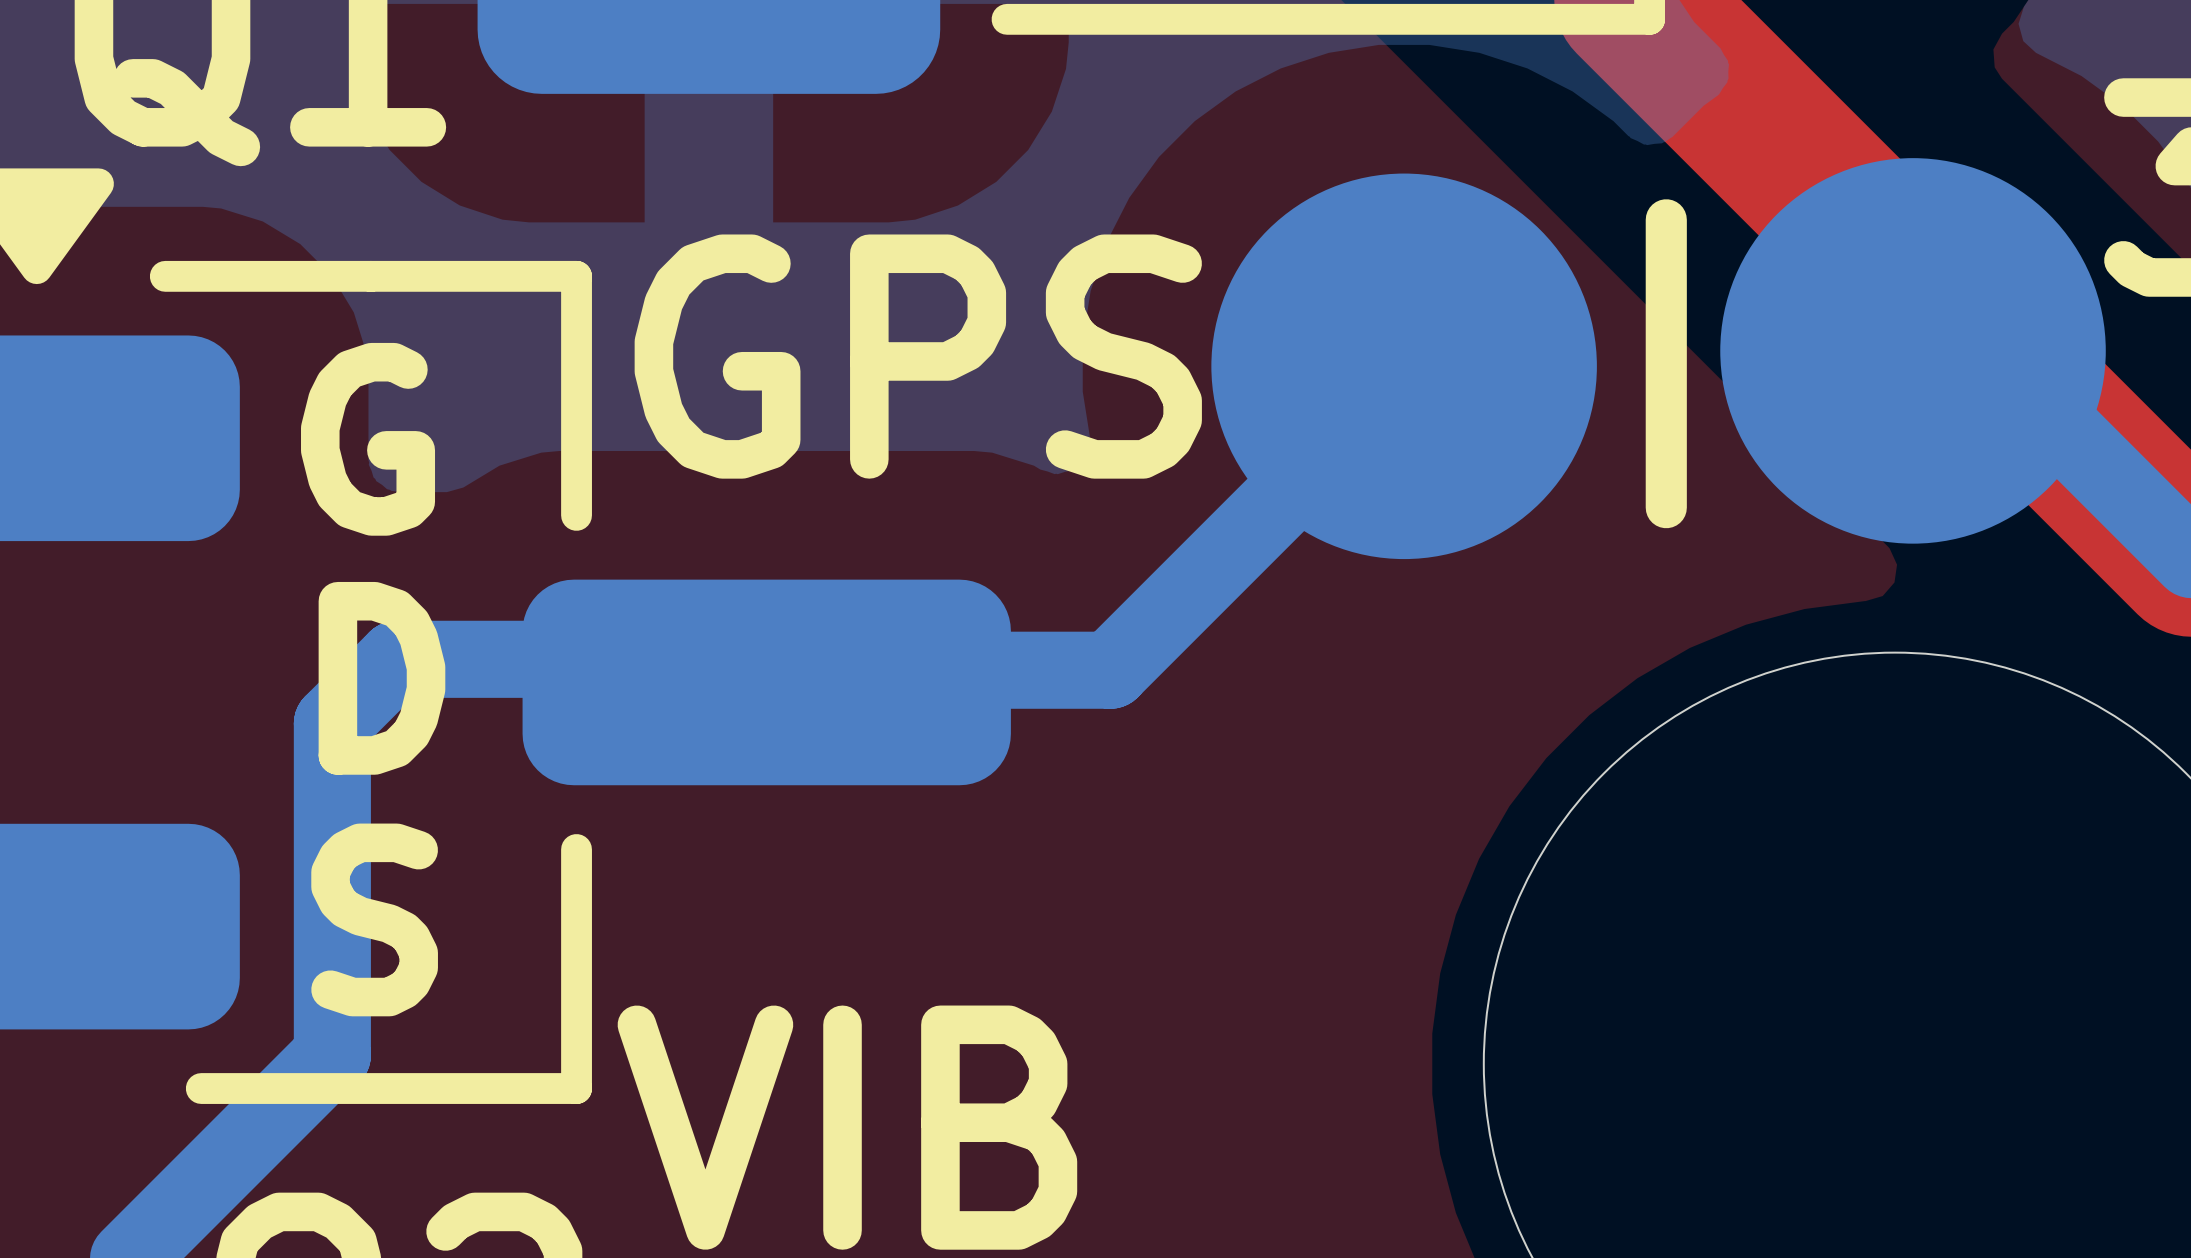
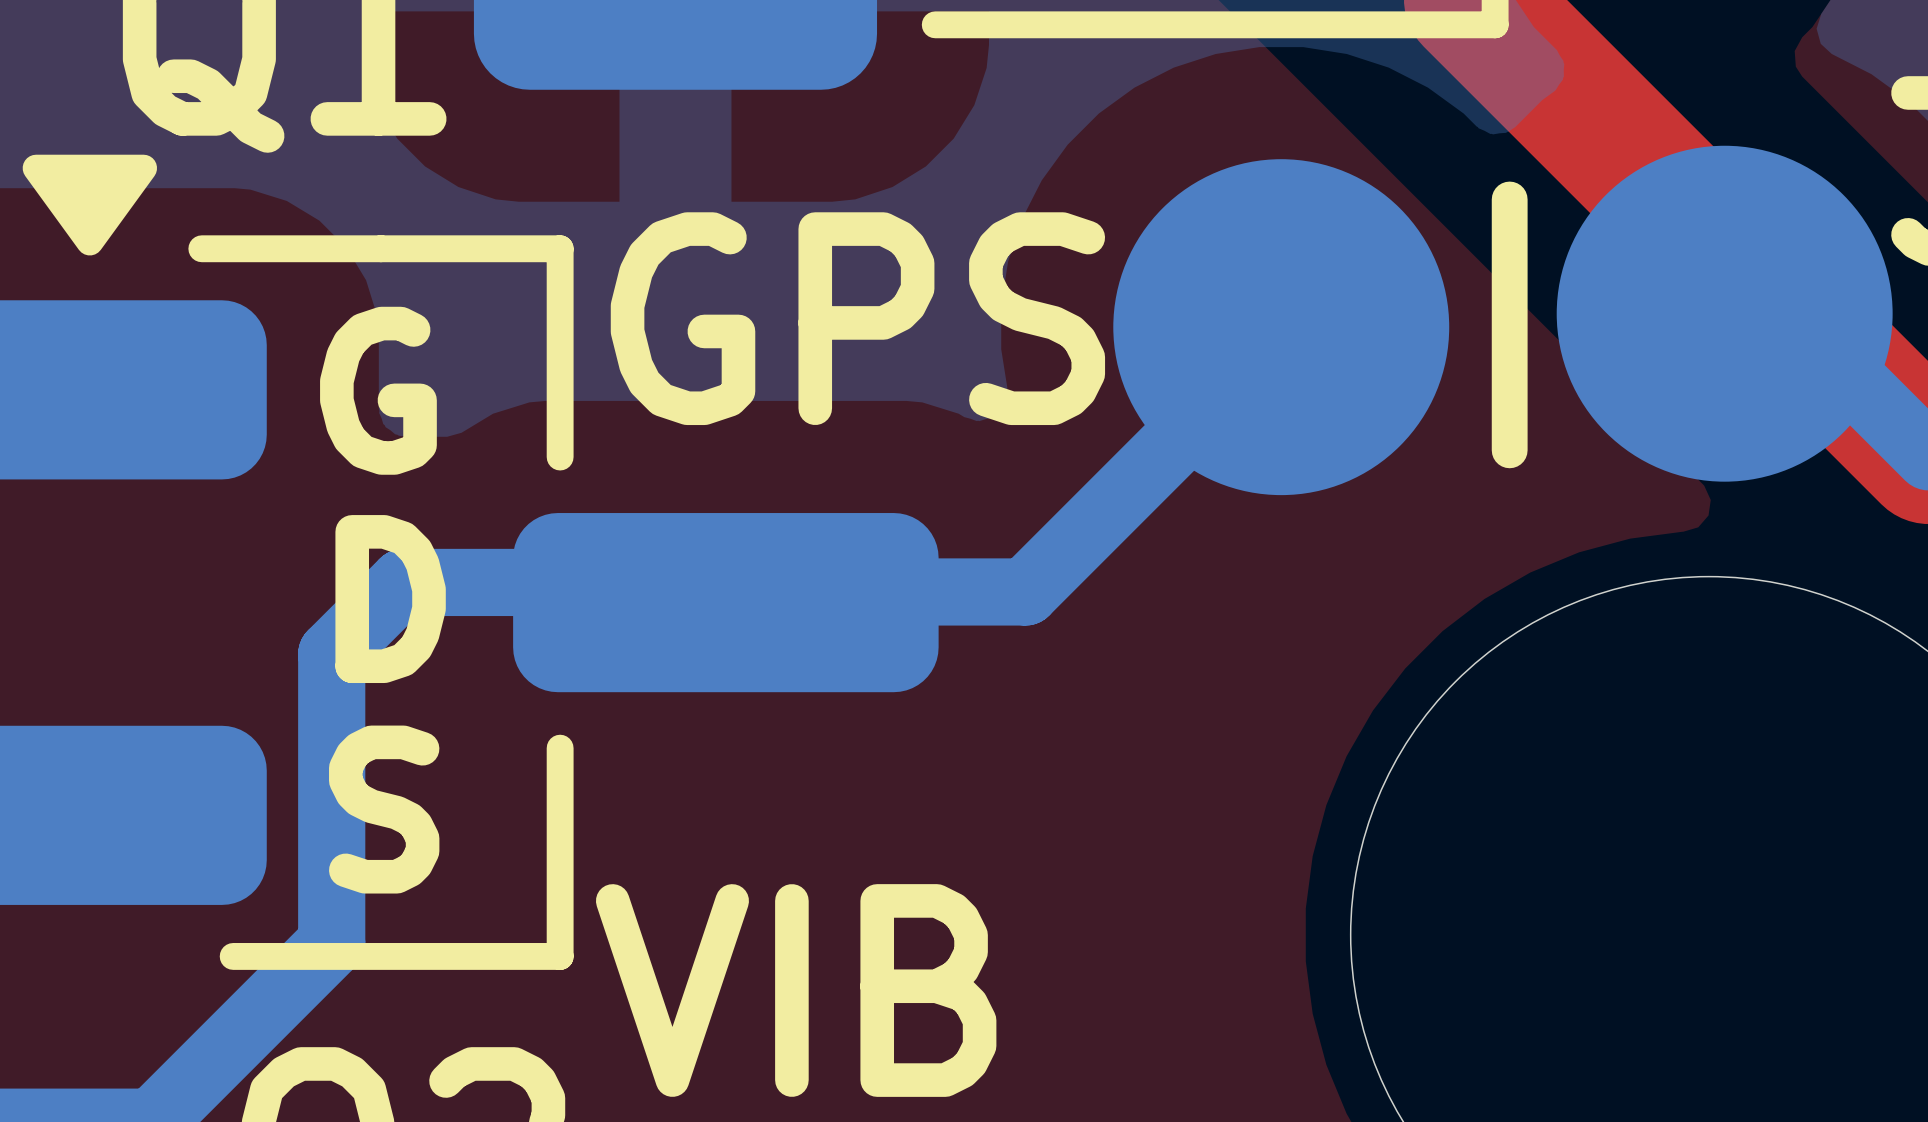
bottom track: (332, 723) (332, 1055) (314, 1073) -> (347, 638) (331, 654) (331, 943)

